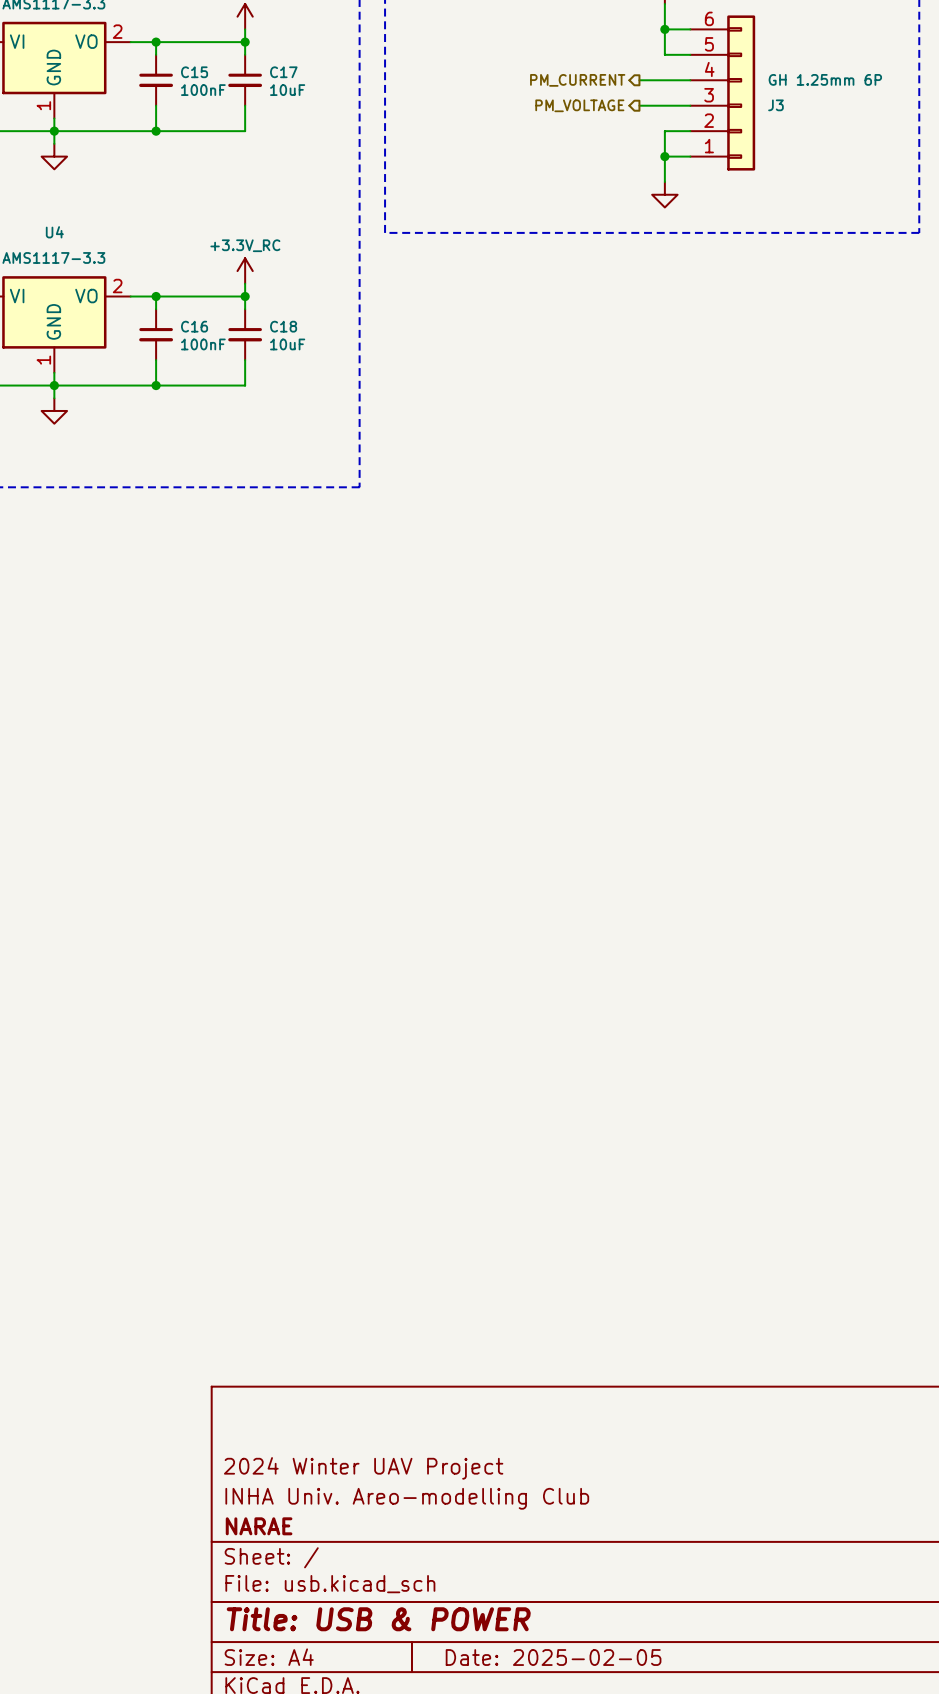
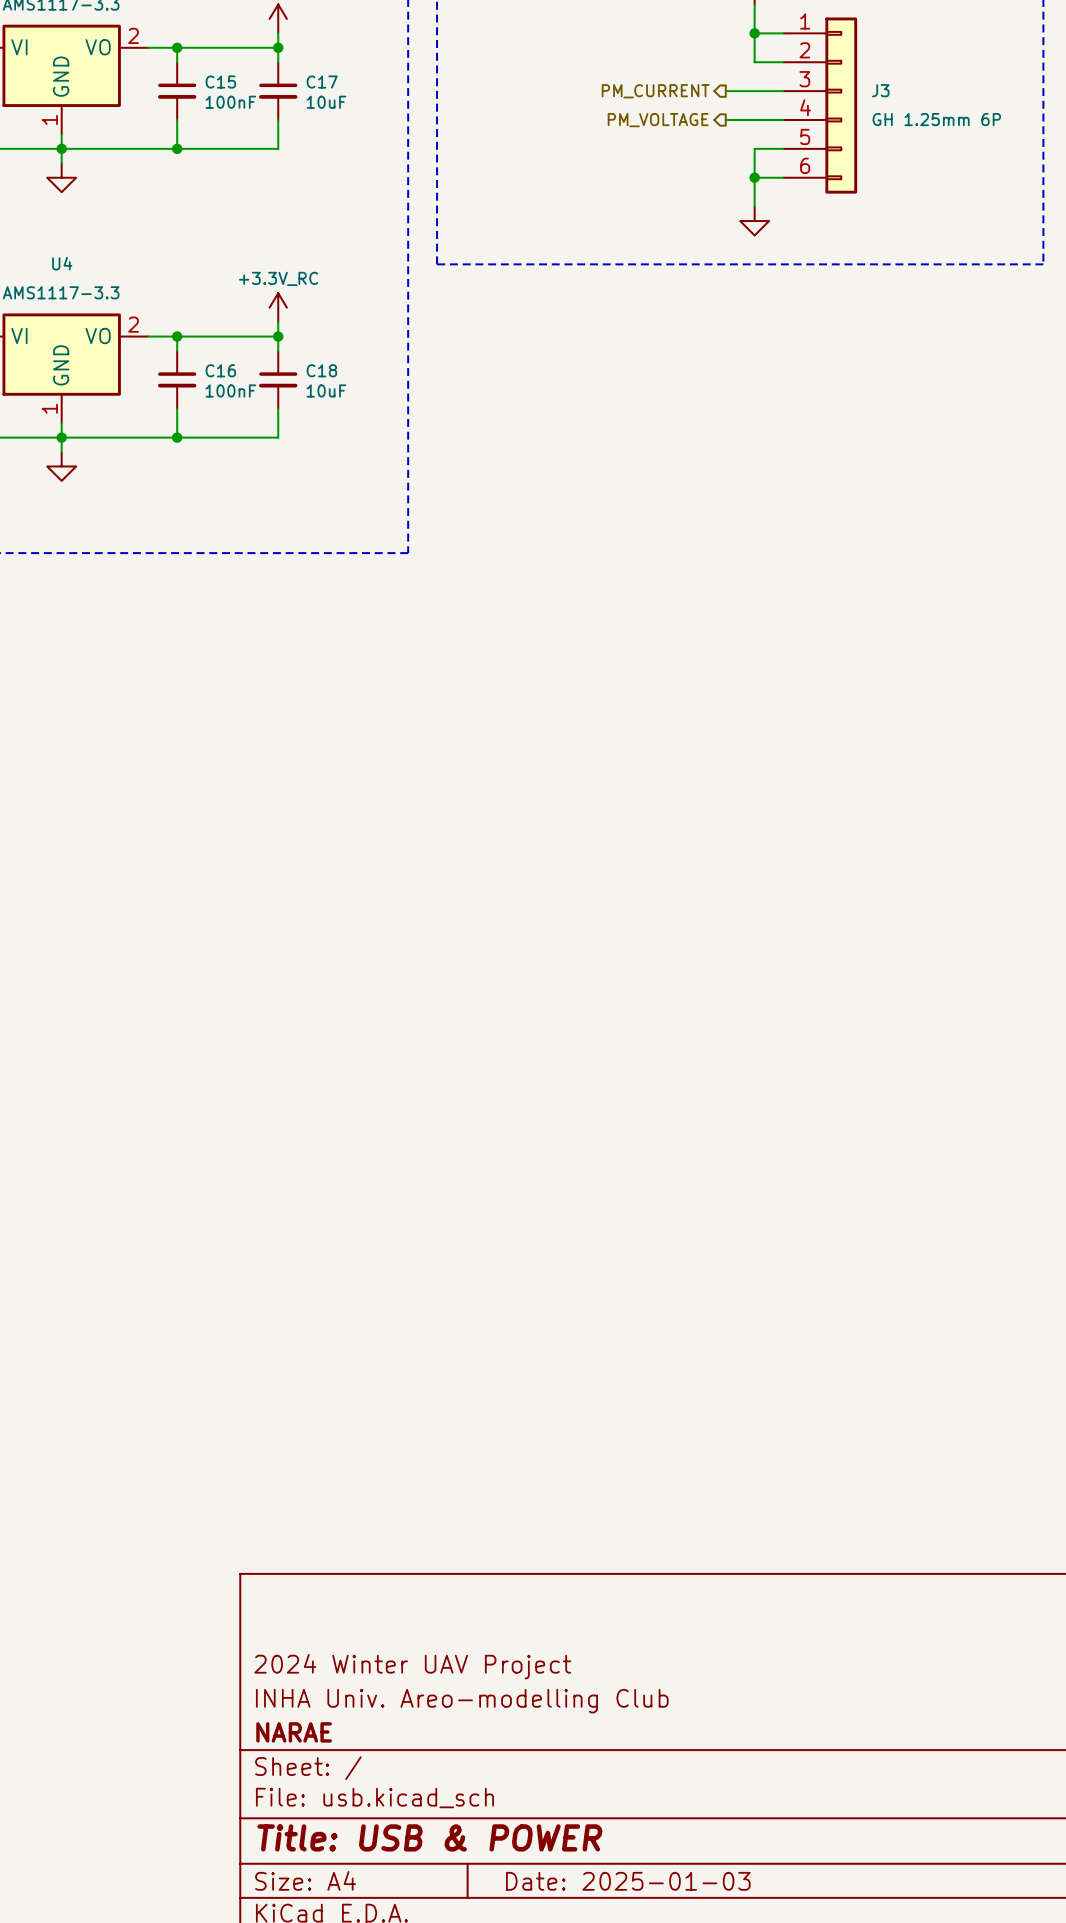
J3 flip: as is (741, 92) -> up-down (841, 105)
title block: Date: 2025-02-05 (553, 1657) -> Date: 2025-01-03 (628, 1881)

